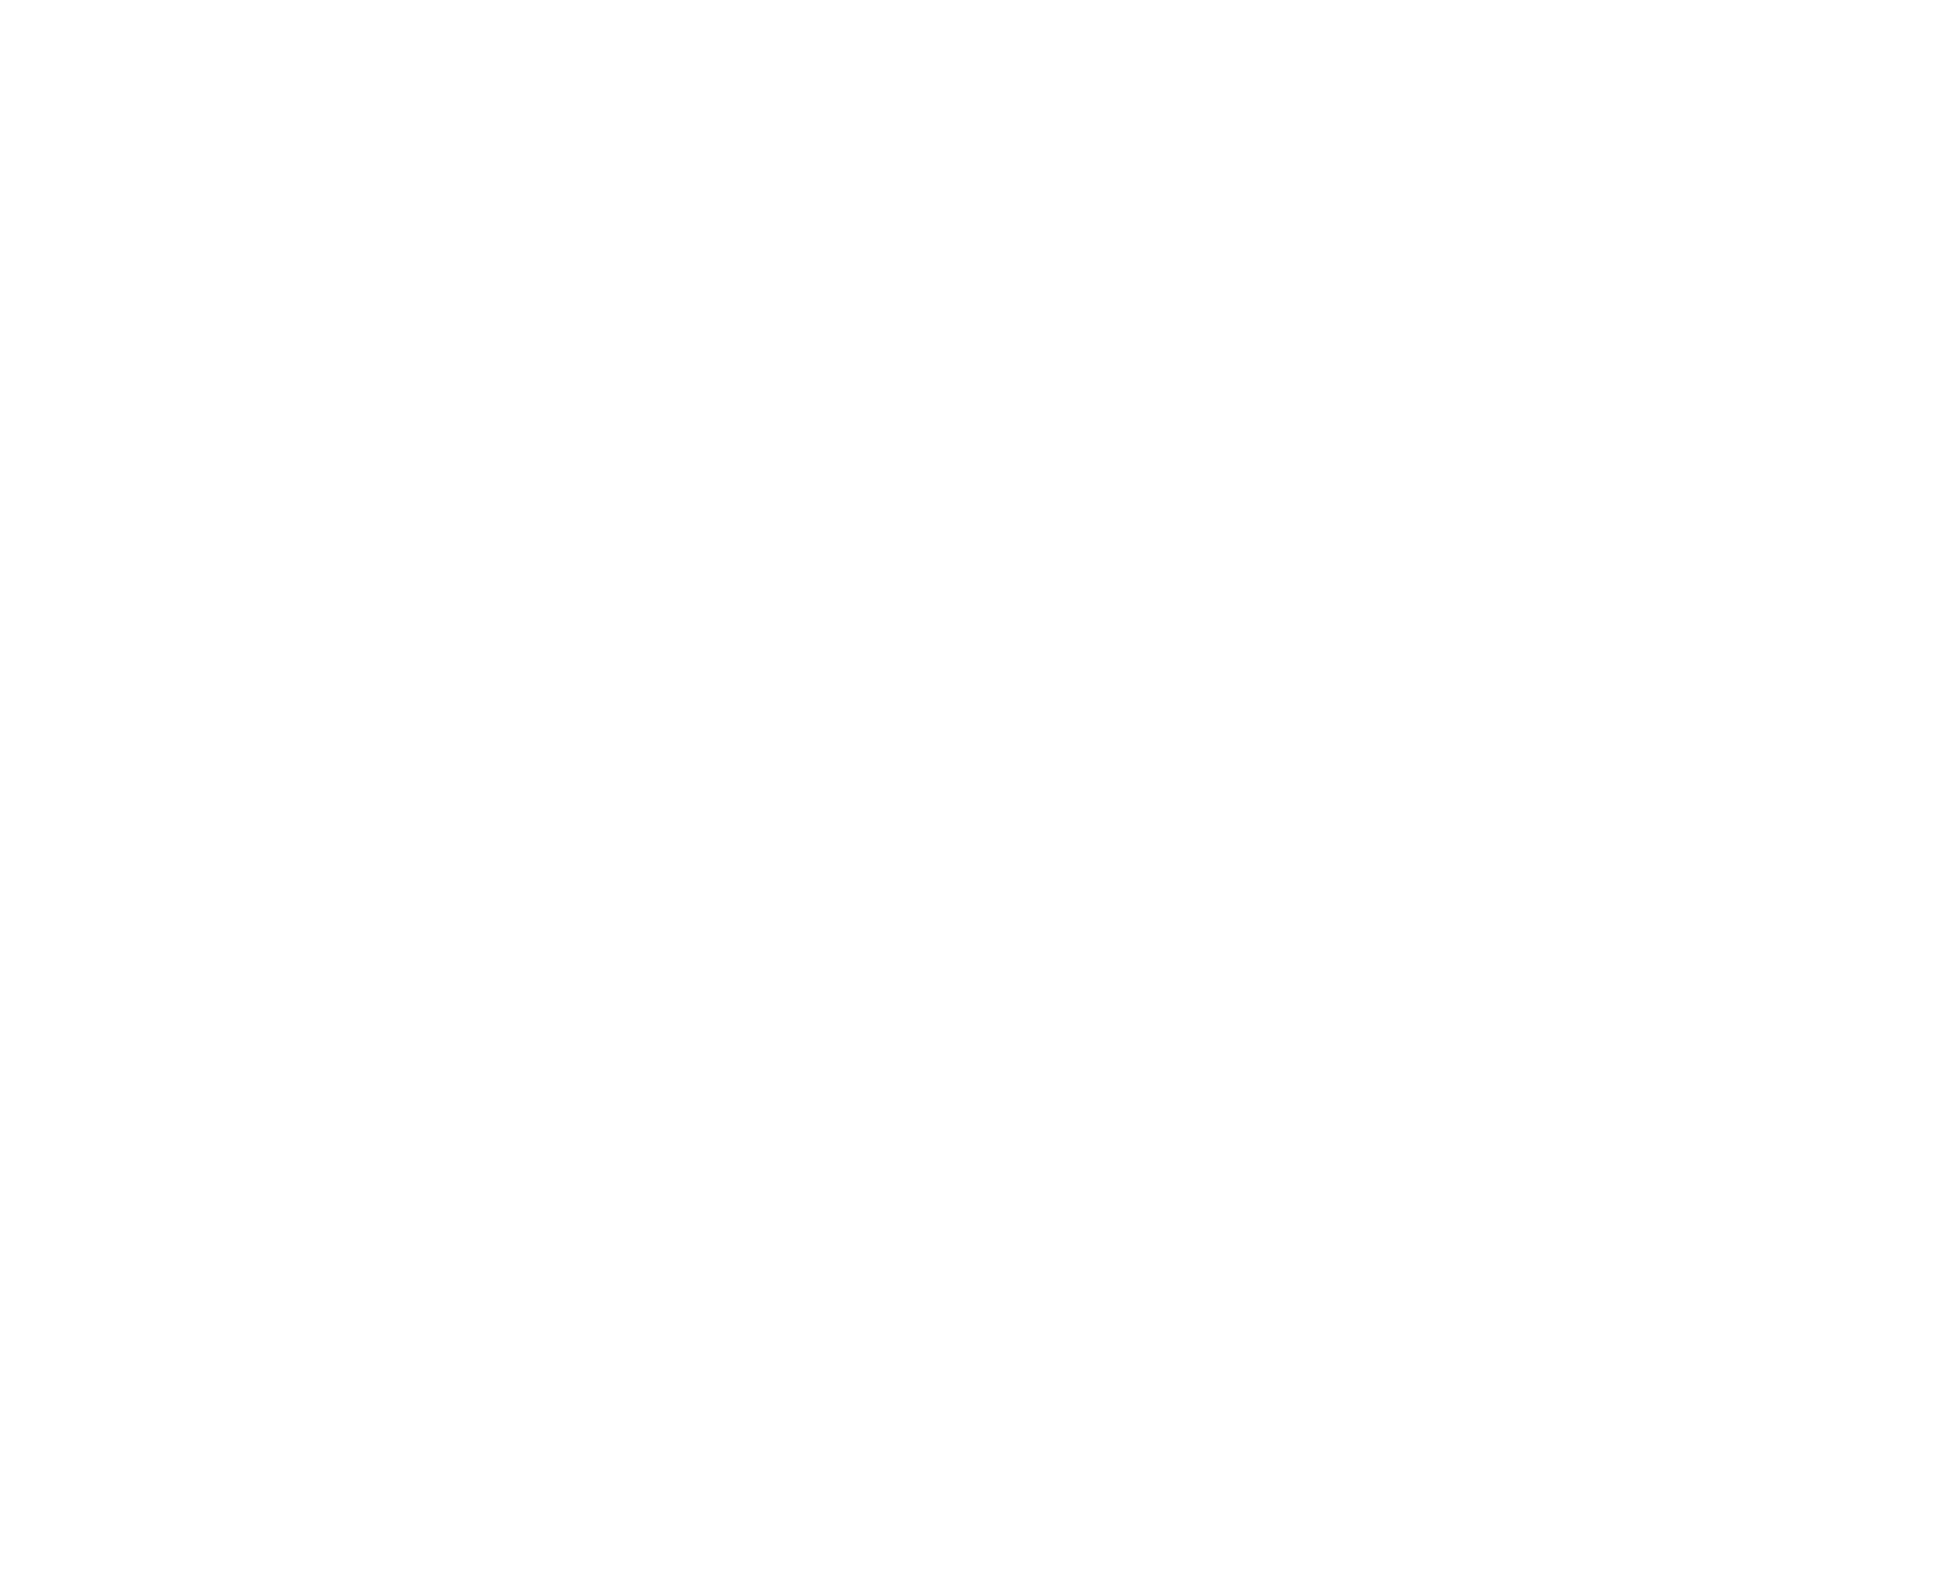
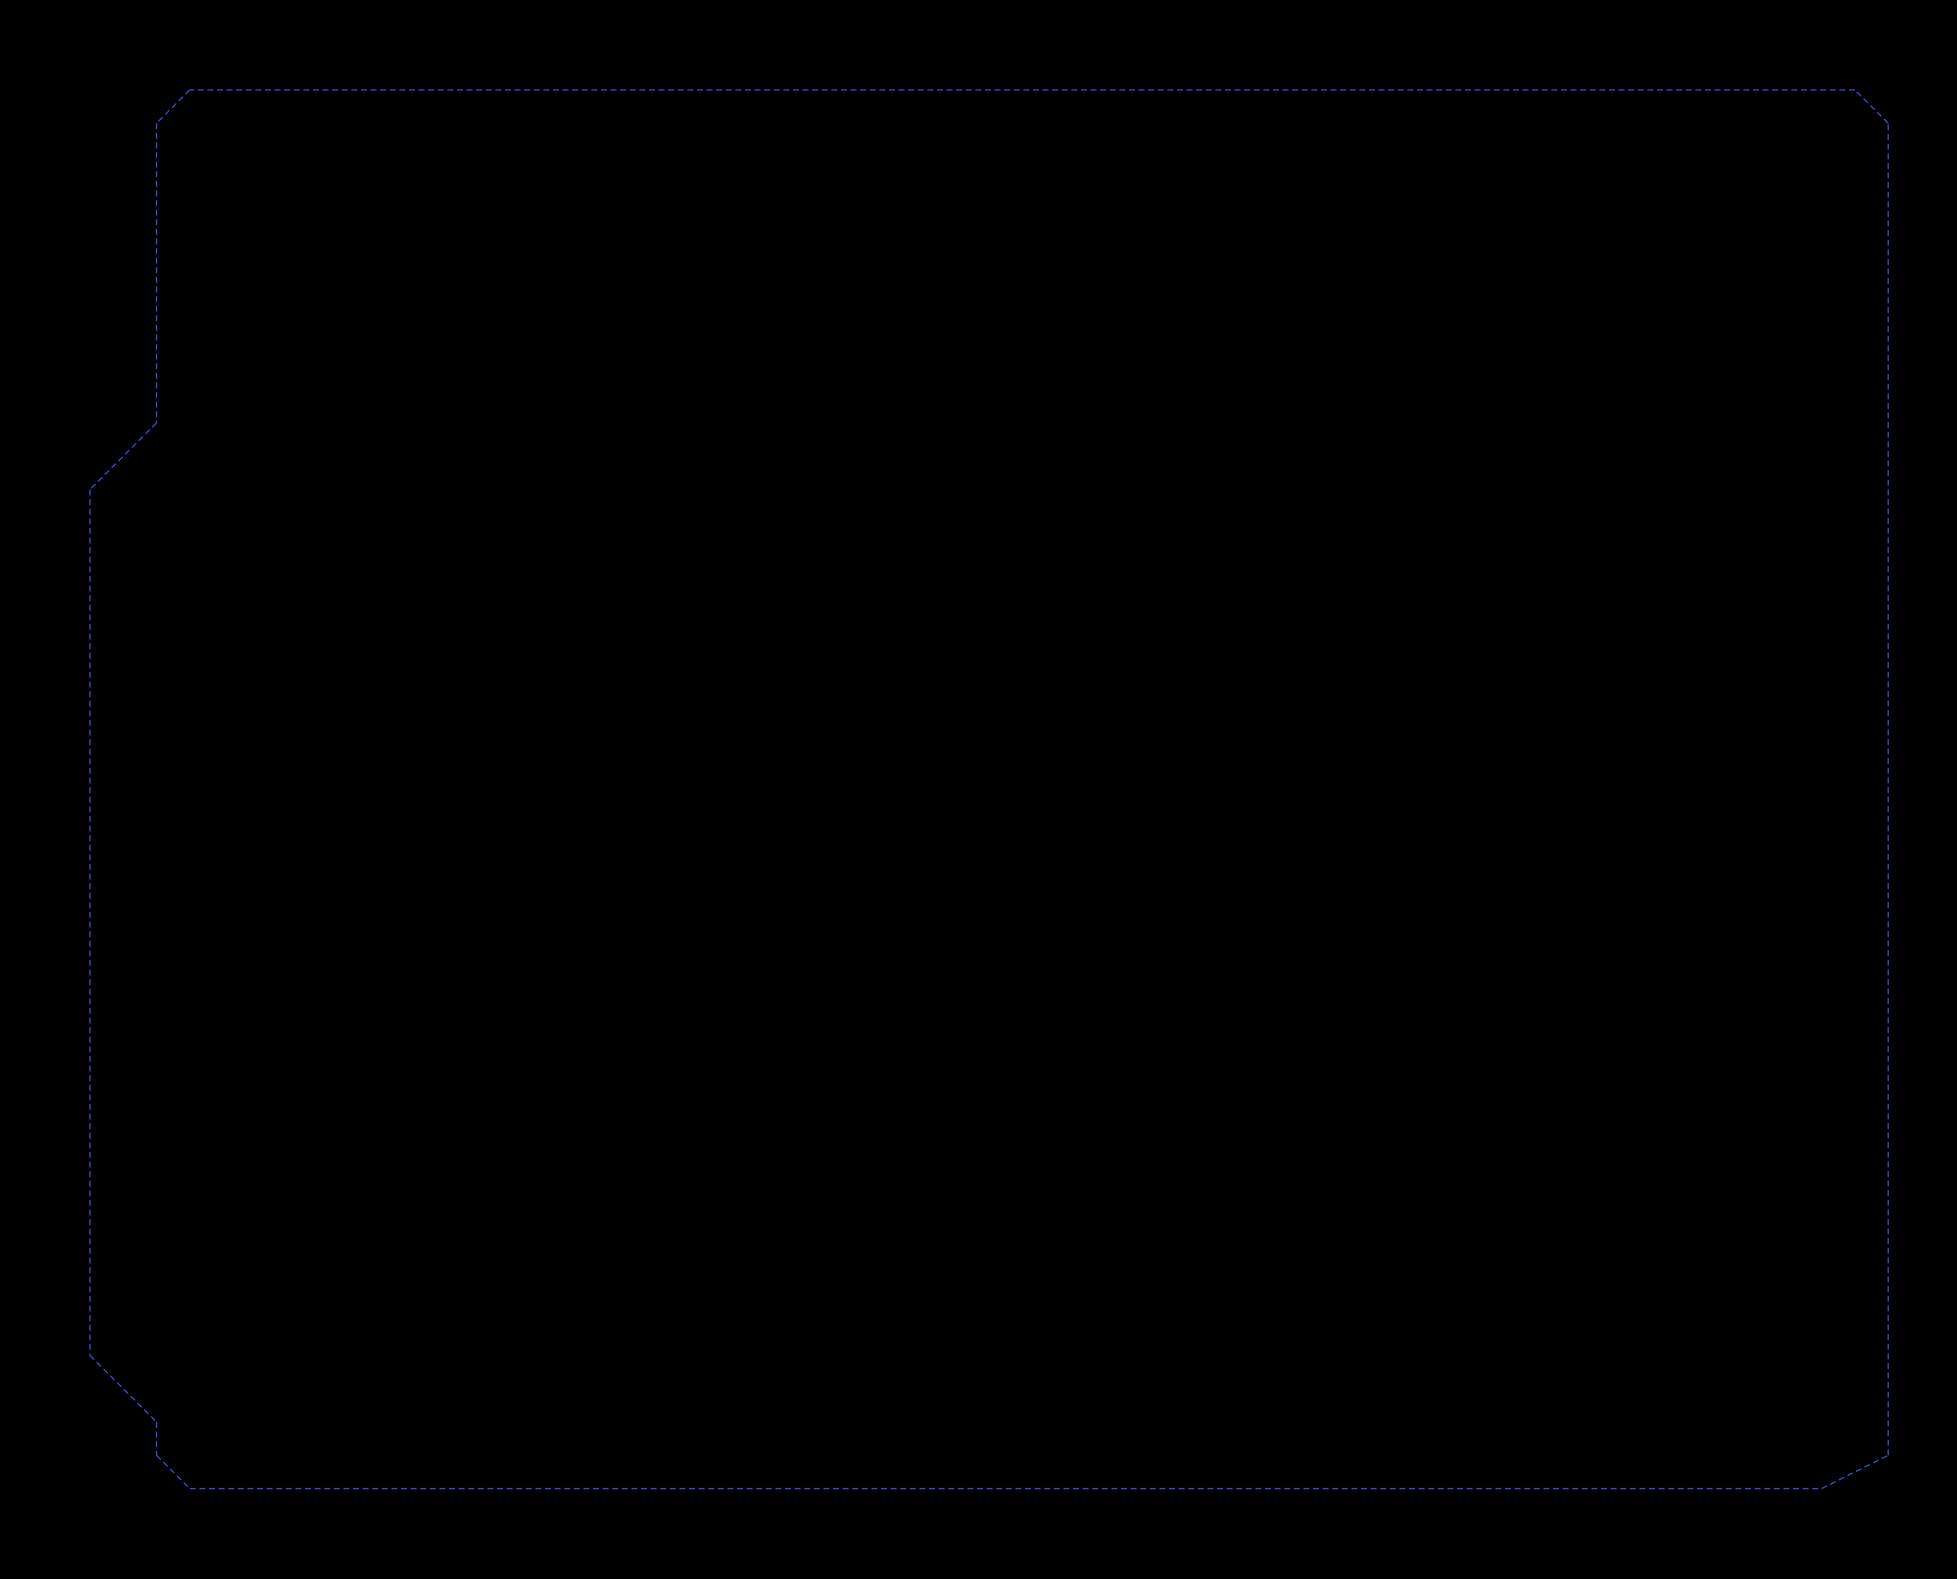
zone outline: none -> (1854, 89) (1888, 123) (1888, 1455) (1821, 1488) (189, 1488) (156, 1455) (156, 1421) (89, 1355) (89, 489) (156, 422) (156, 123) (189, 89) (1854, 89)

